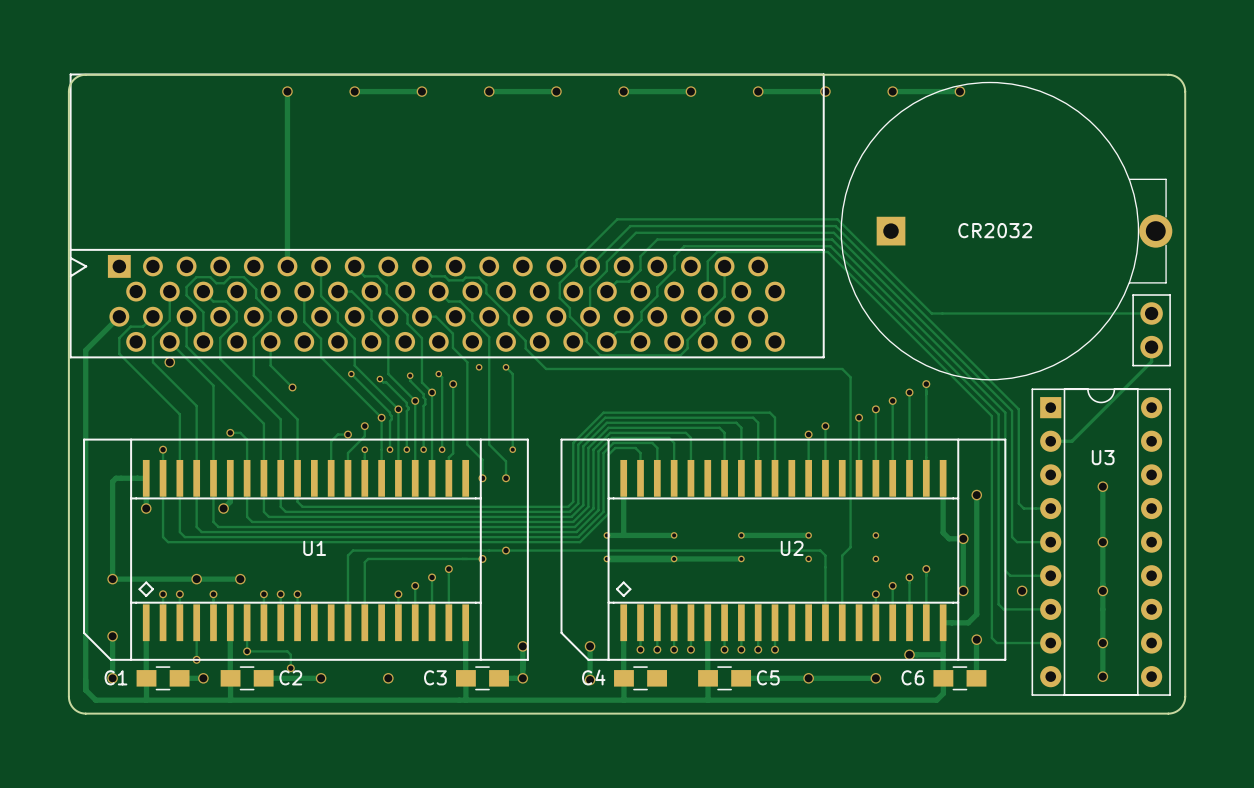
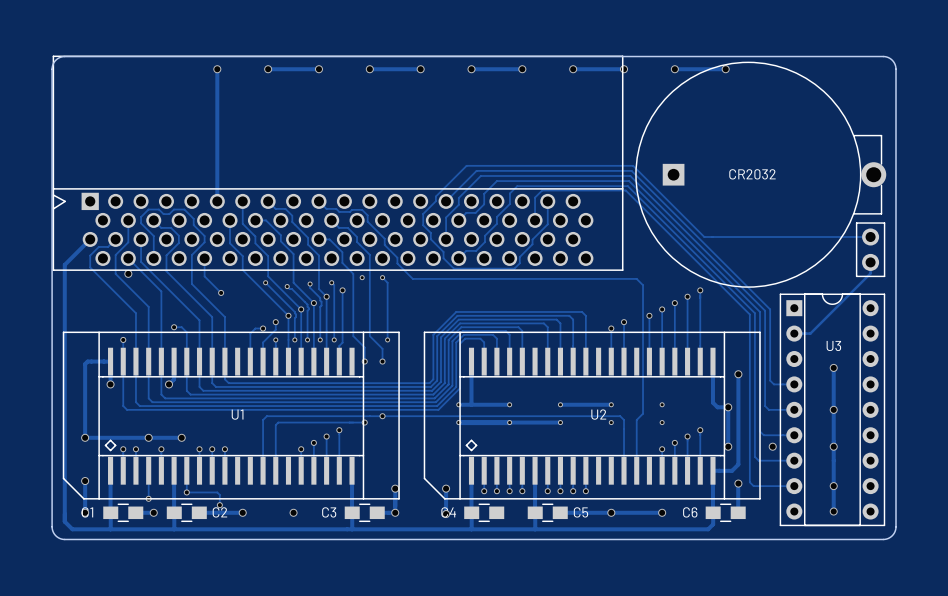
track: (909, 654) (943, 654) -> none
via: (909, 654) -> none

